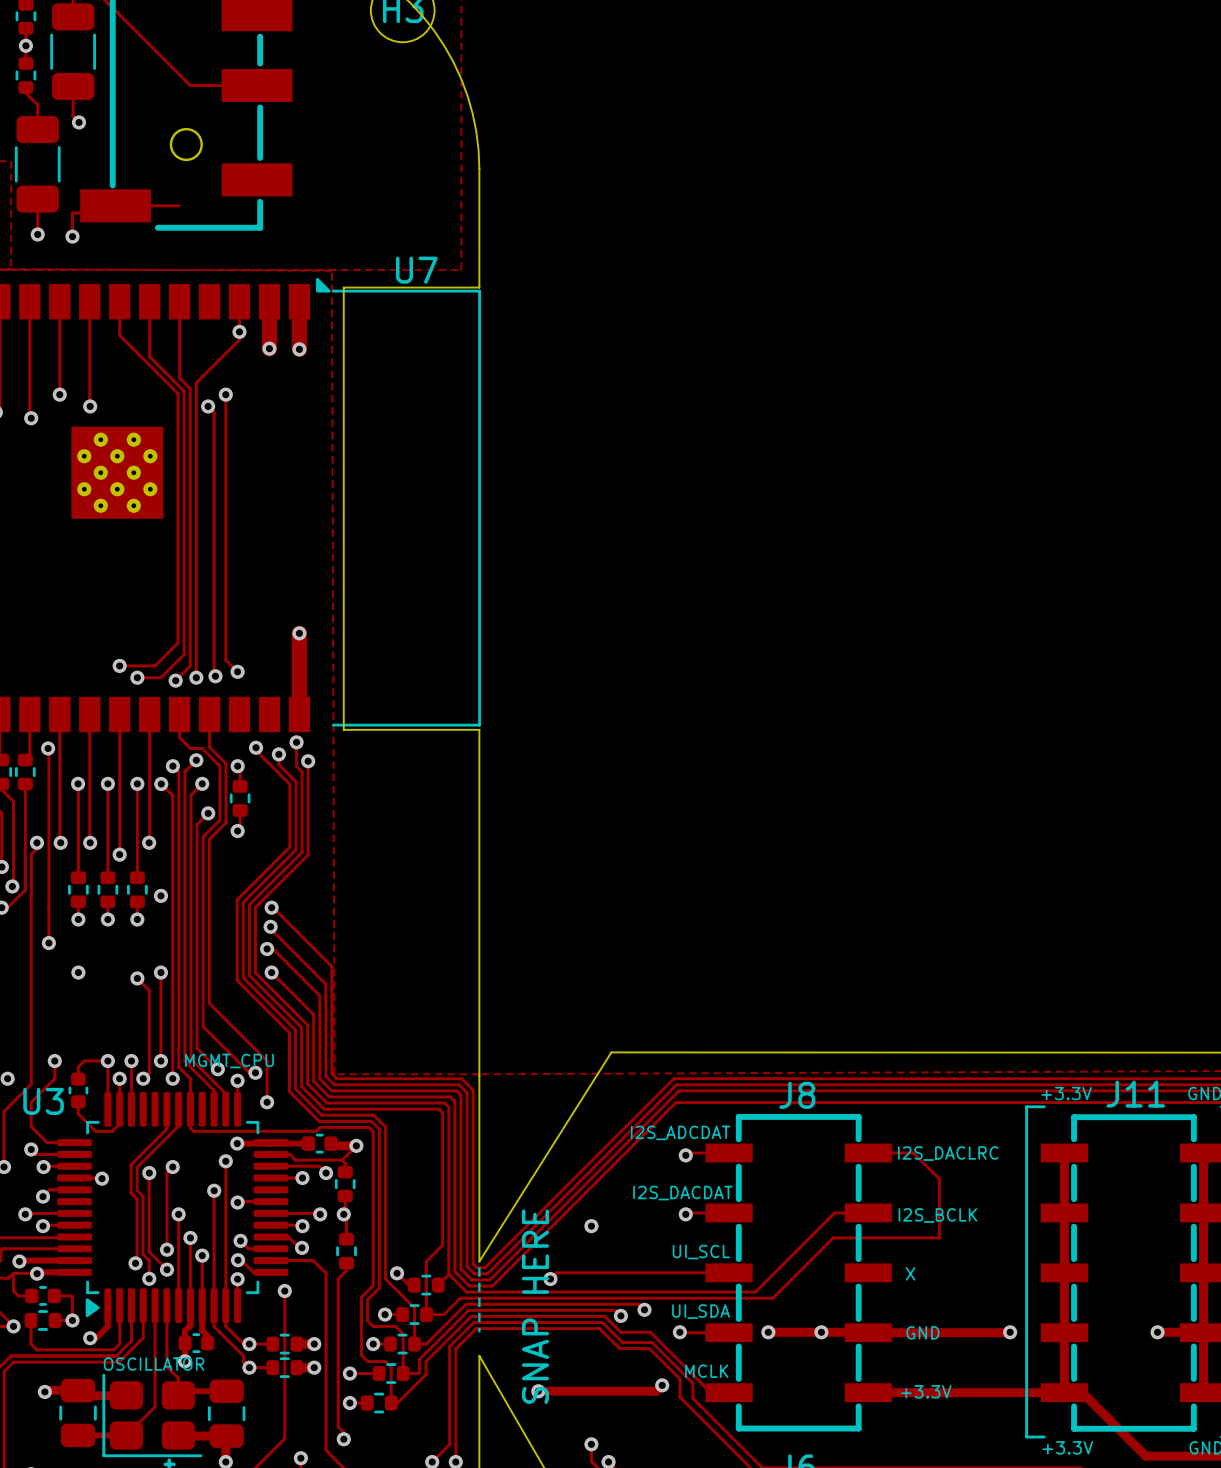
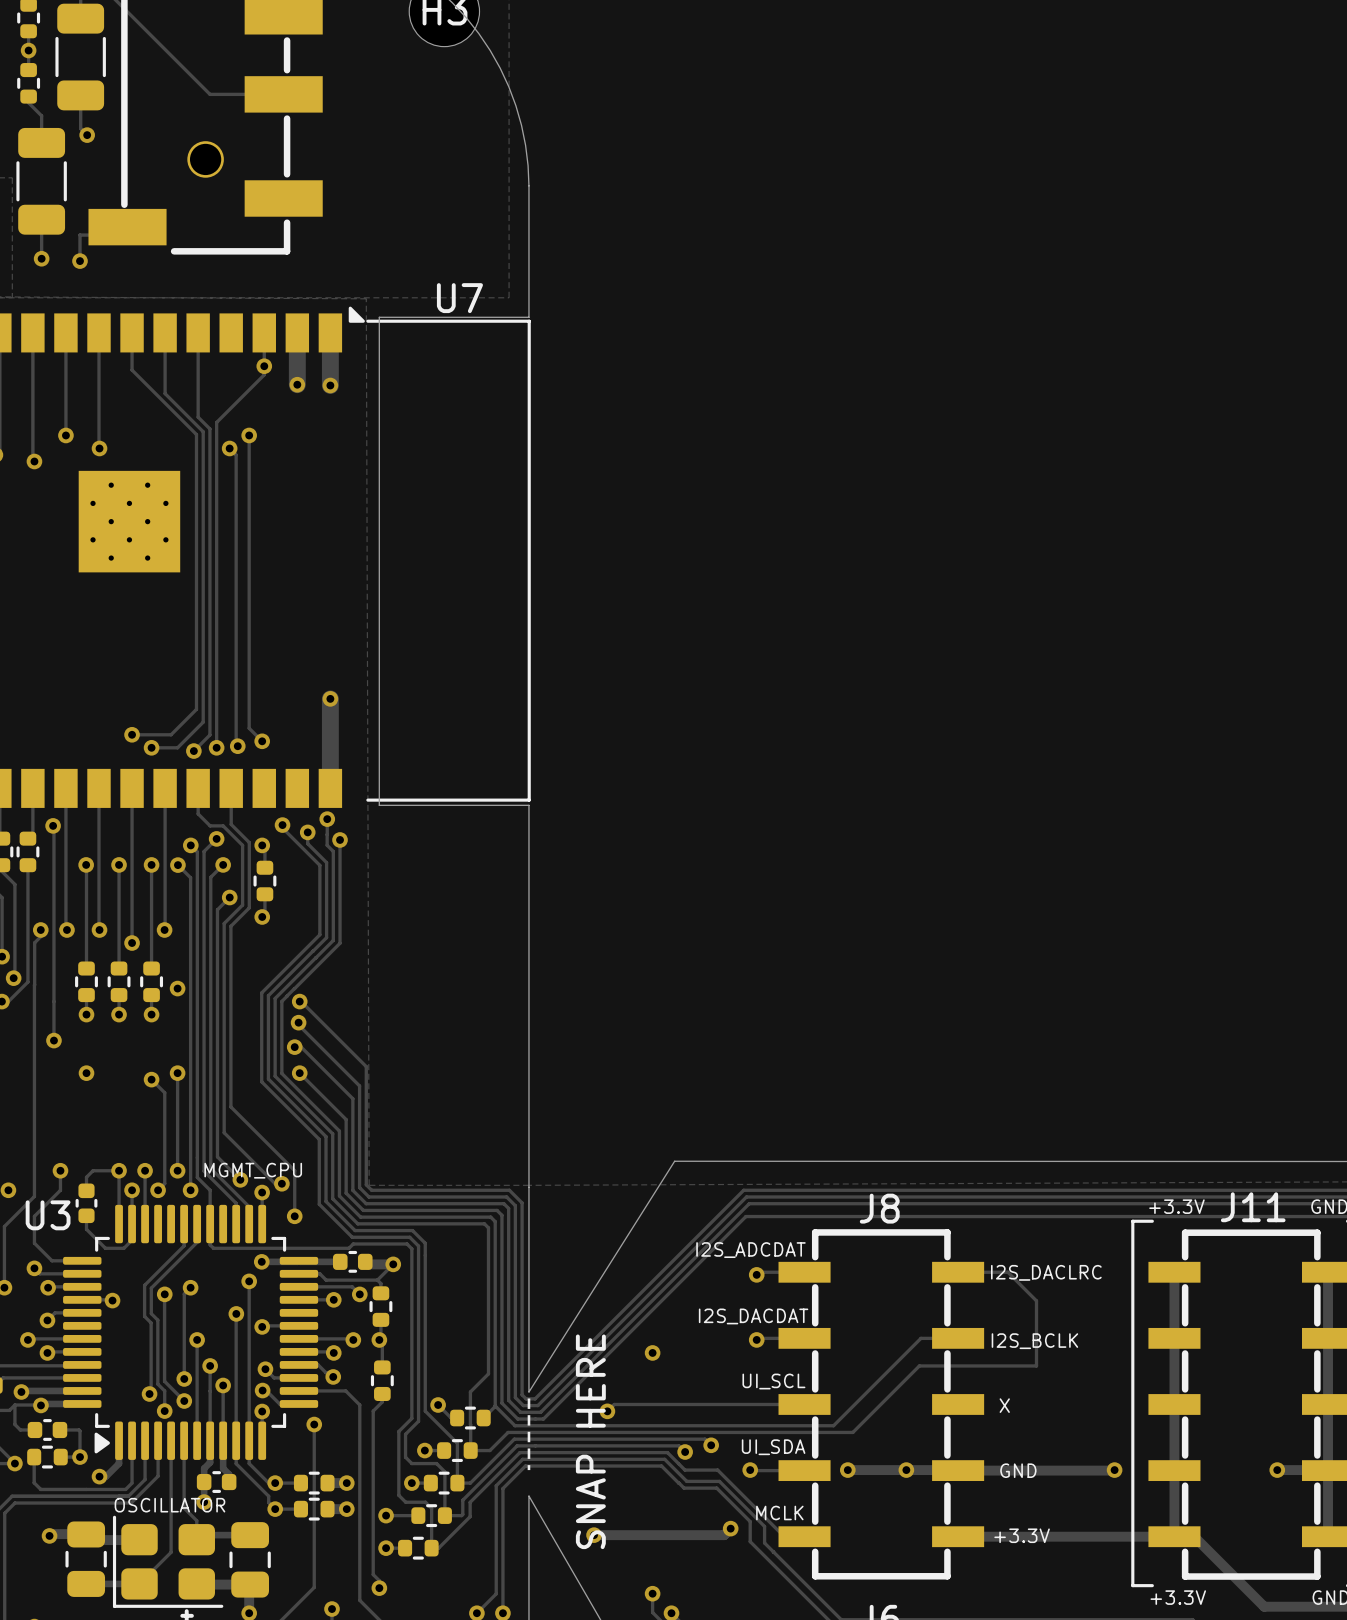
track: (115, 205) (179, 205) -> none

